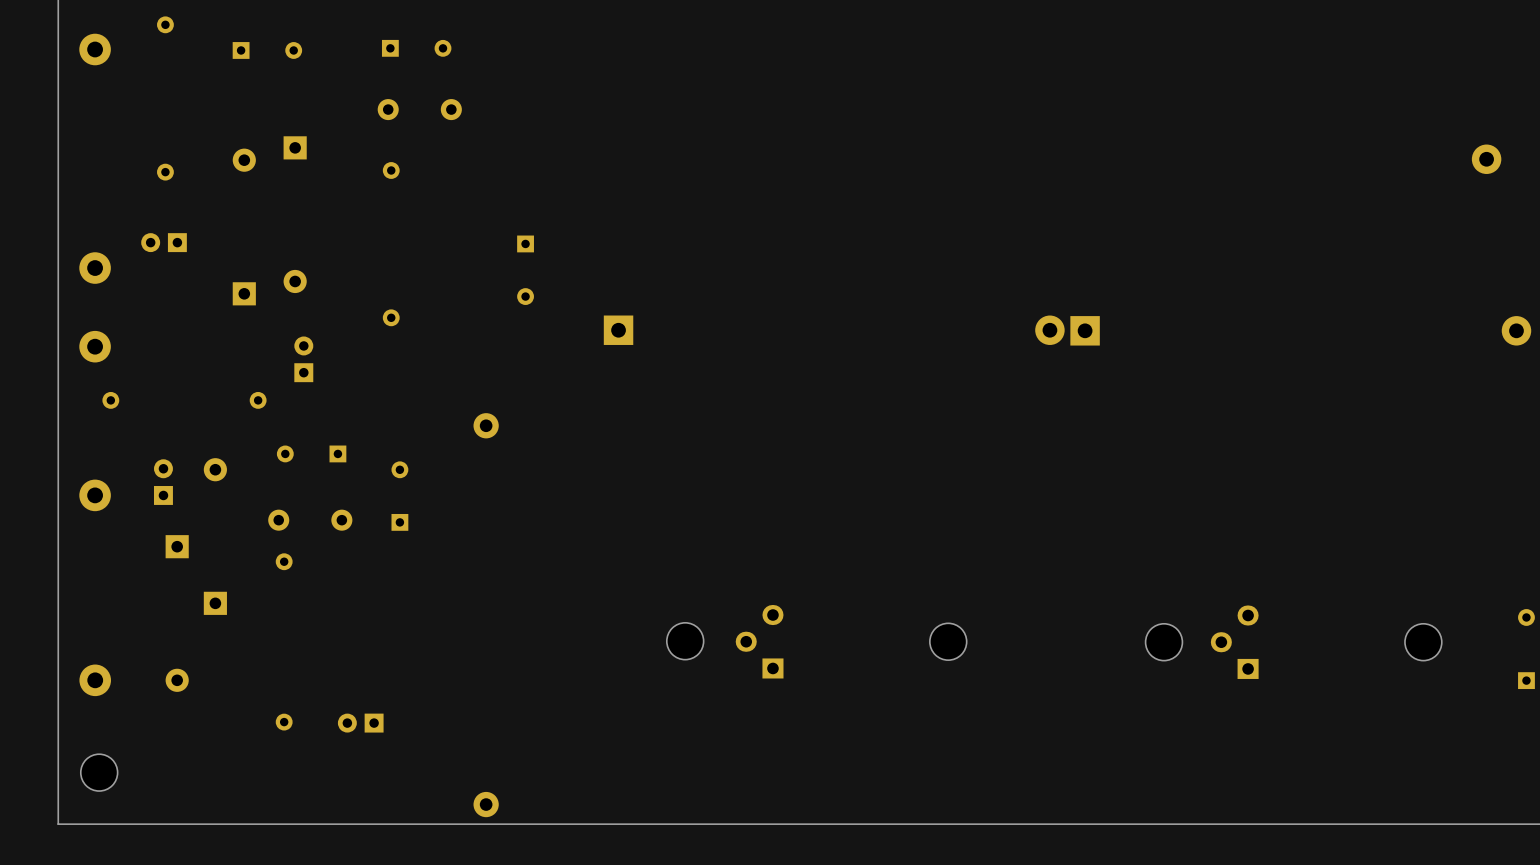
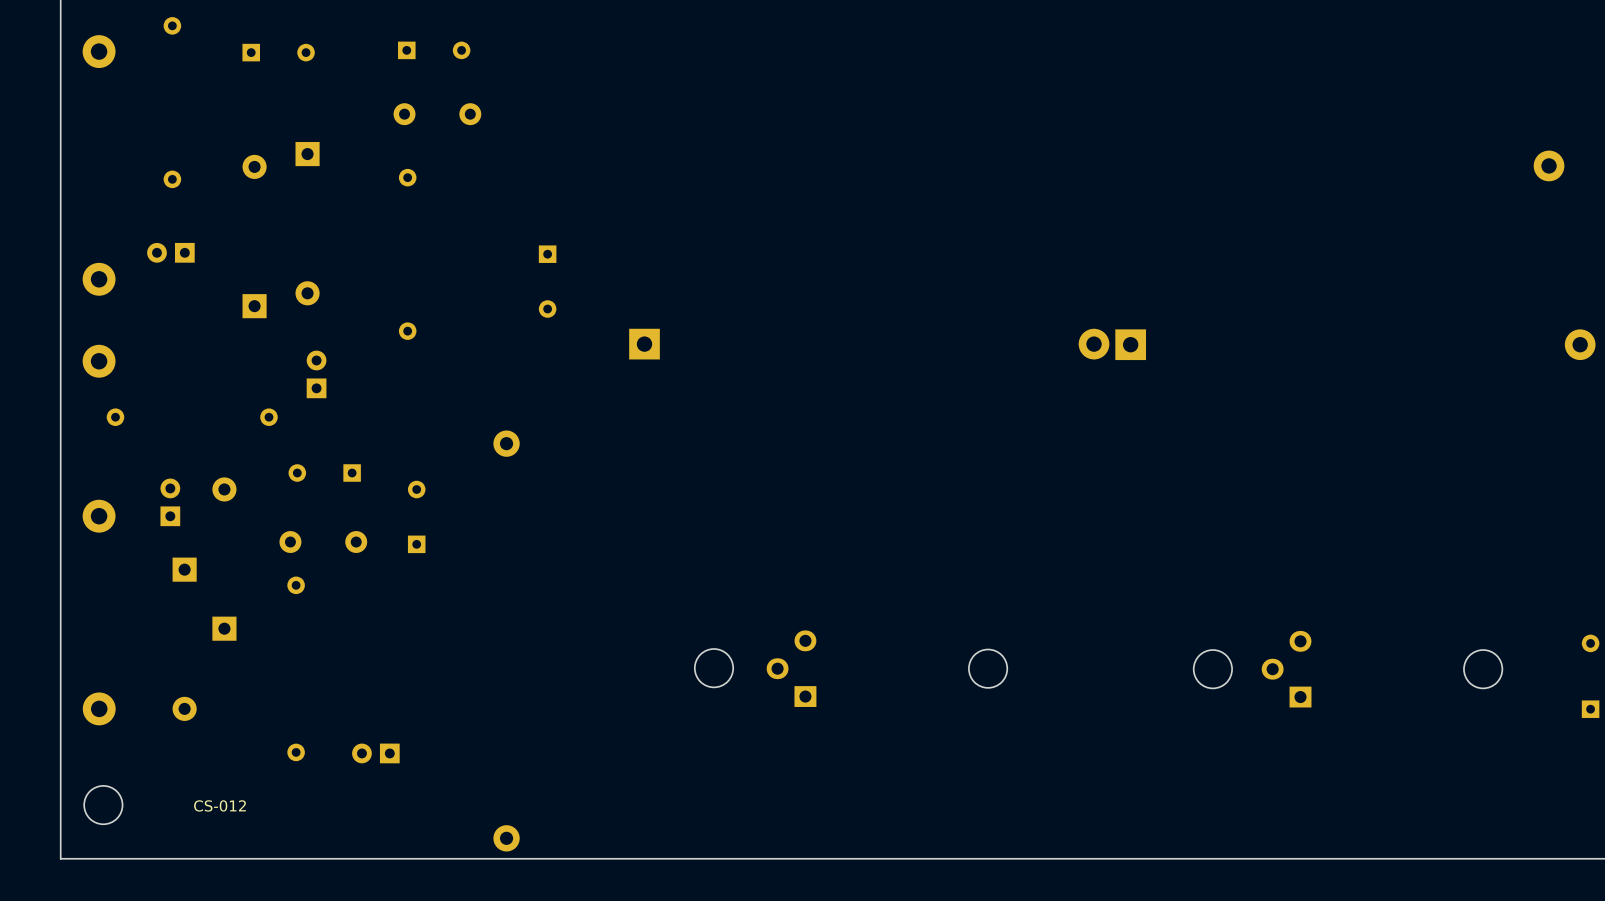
text: none -> CS-012 (220, 805)

